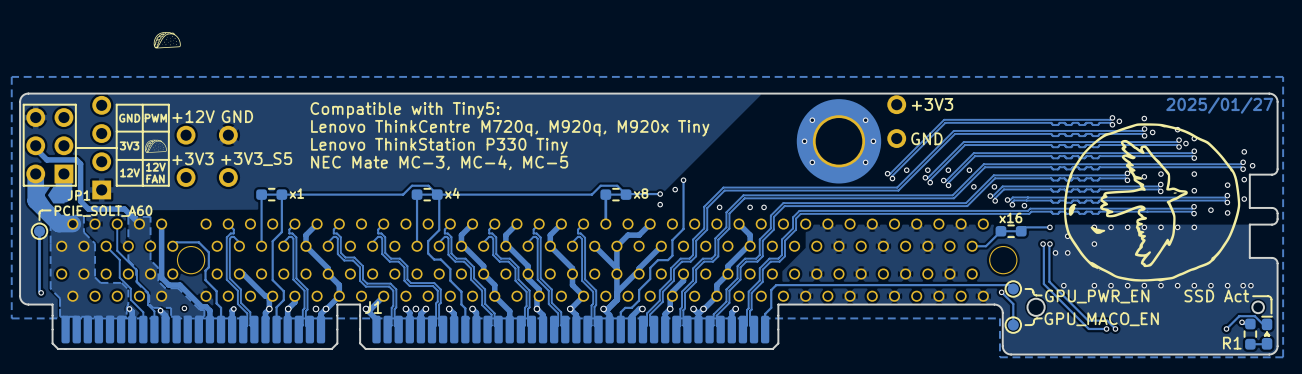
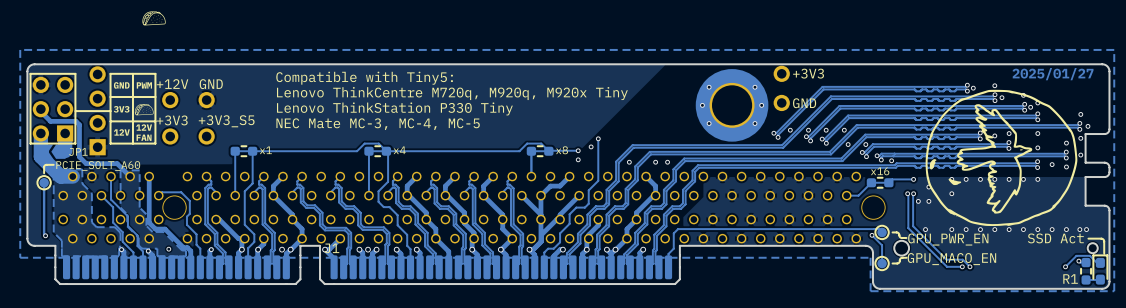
part footprint: [1261, 316, 1273, 350] -> [1092, 254, 1108, 285]
line: (1269, 335) (1264, 335) (1267, 332) (1269, 335) -> none

